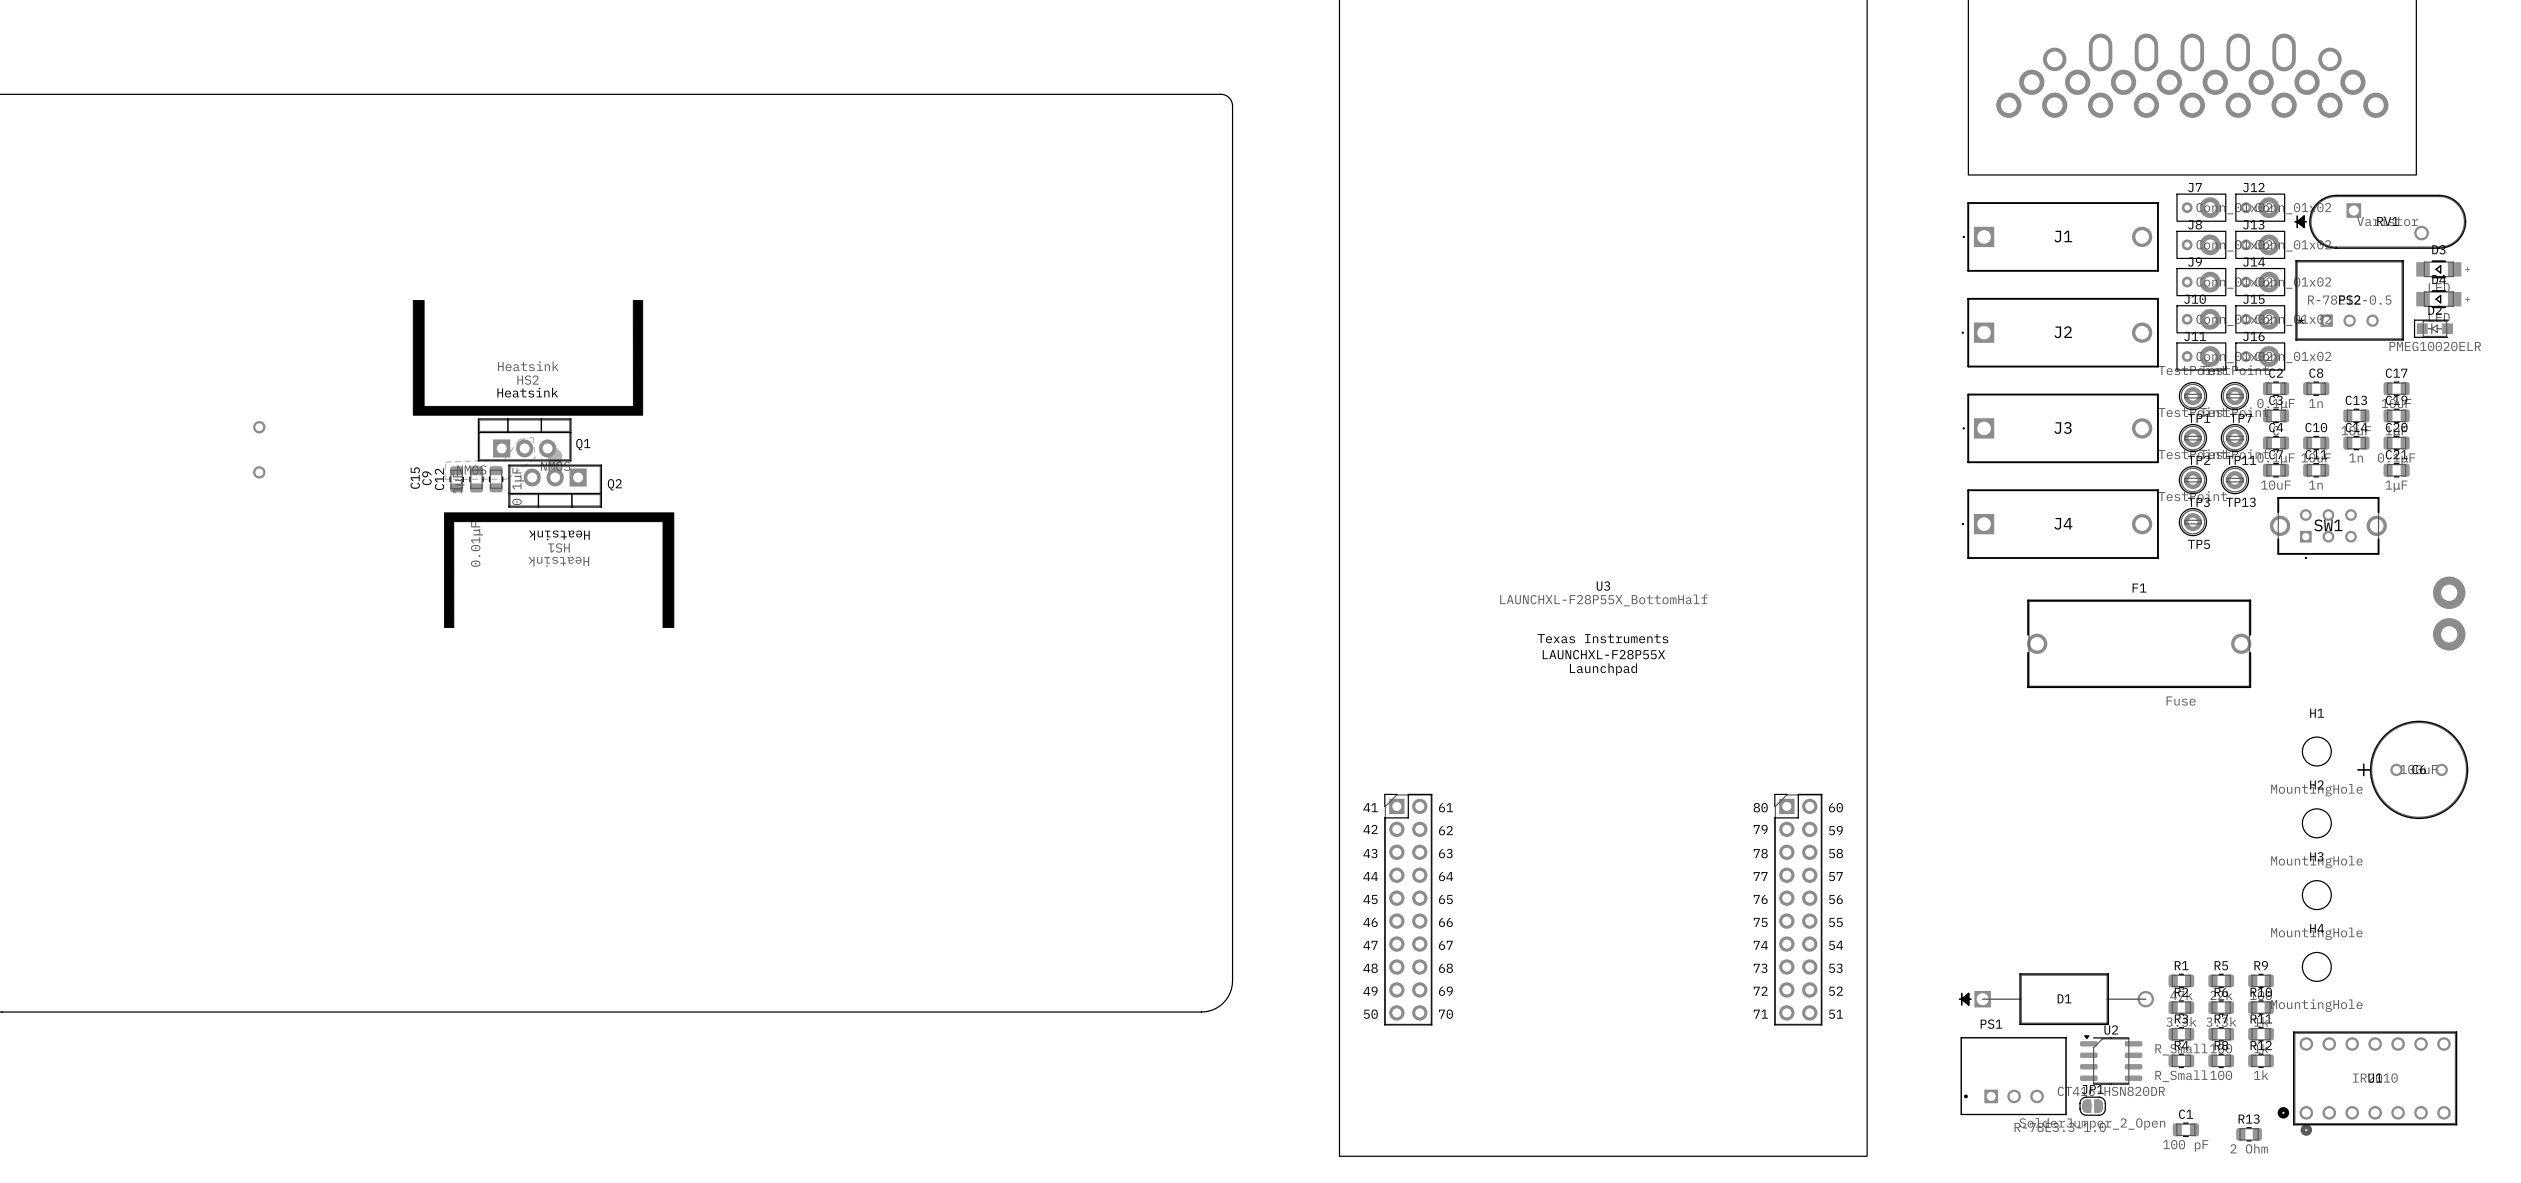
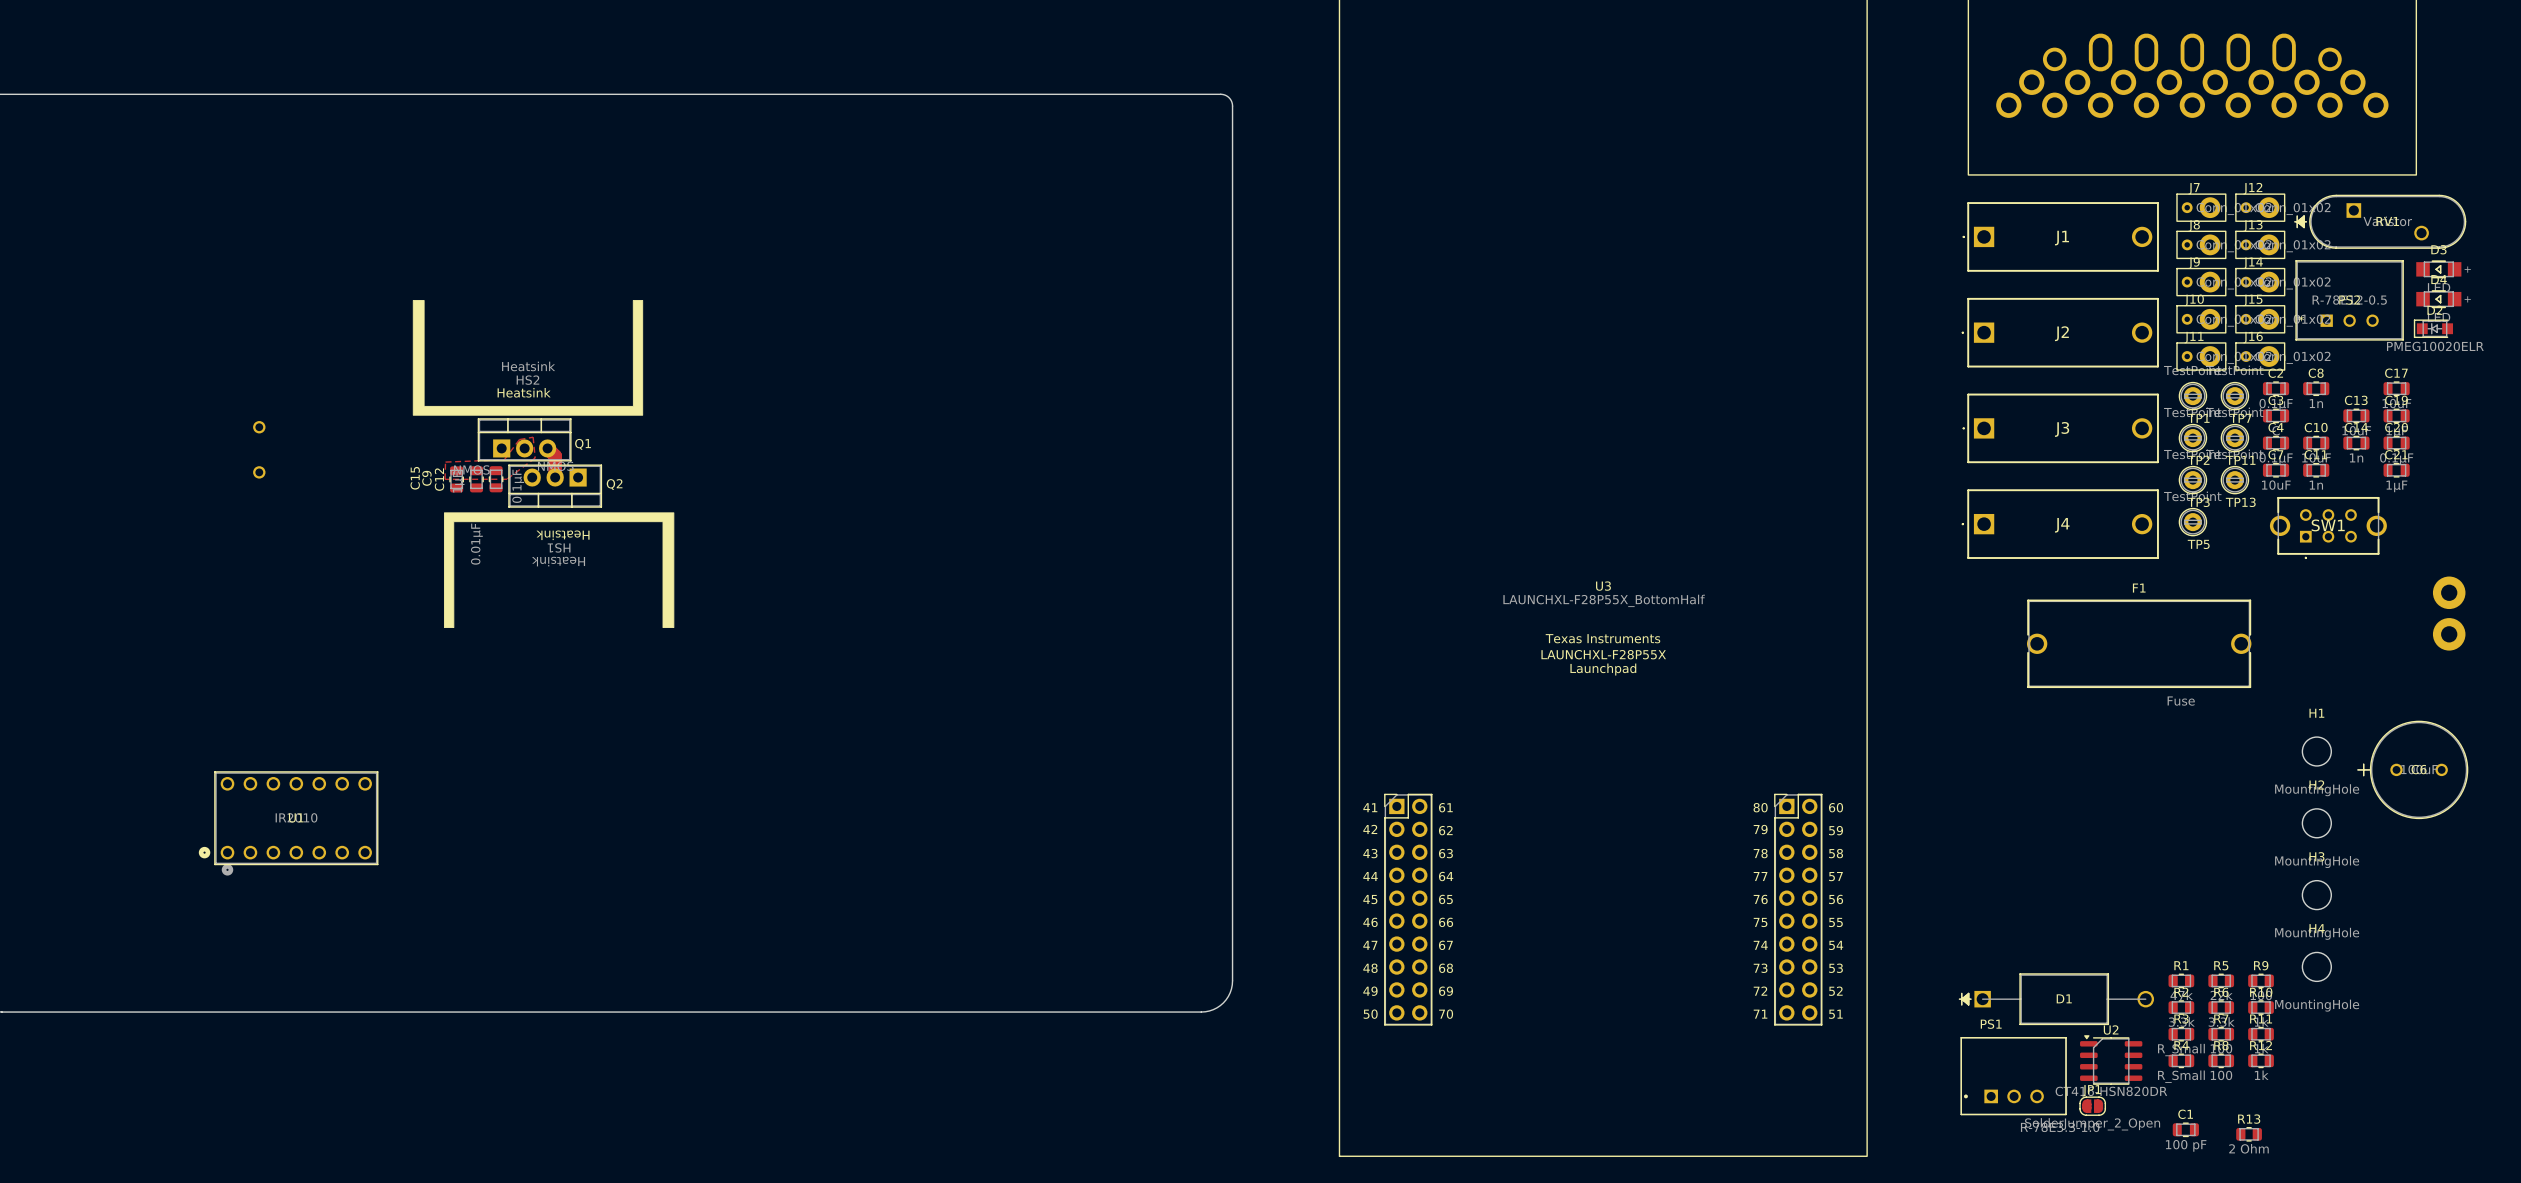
U1 position: (2367, 1083) -> (288, 823)

